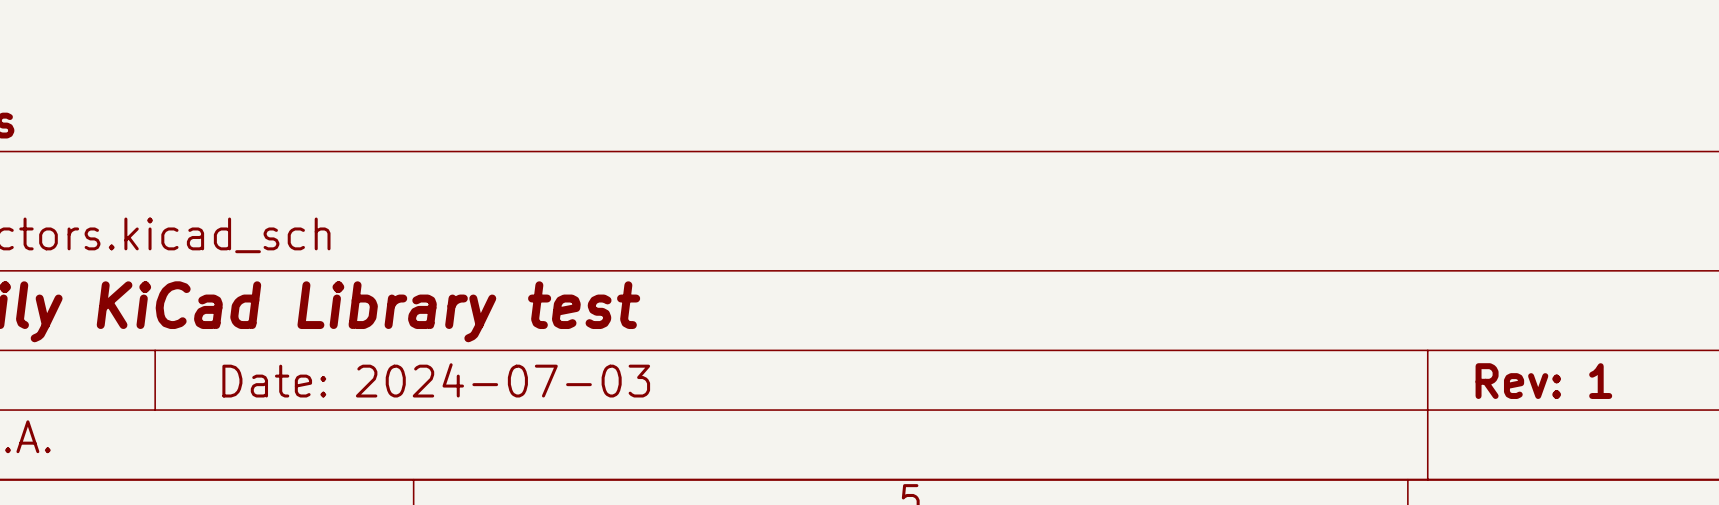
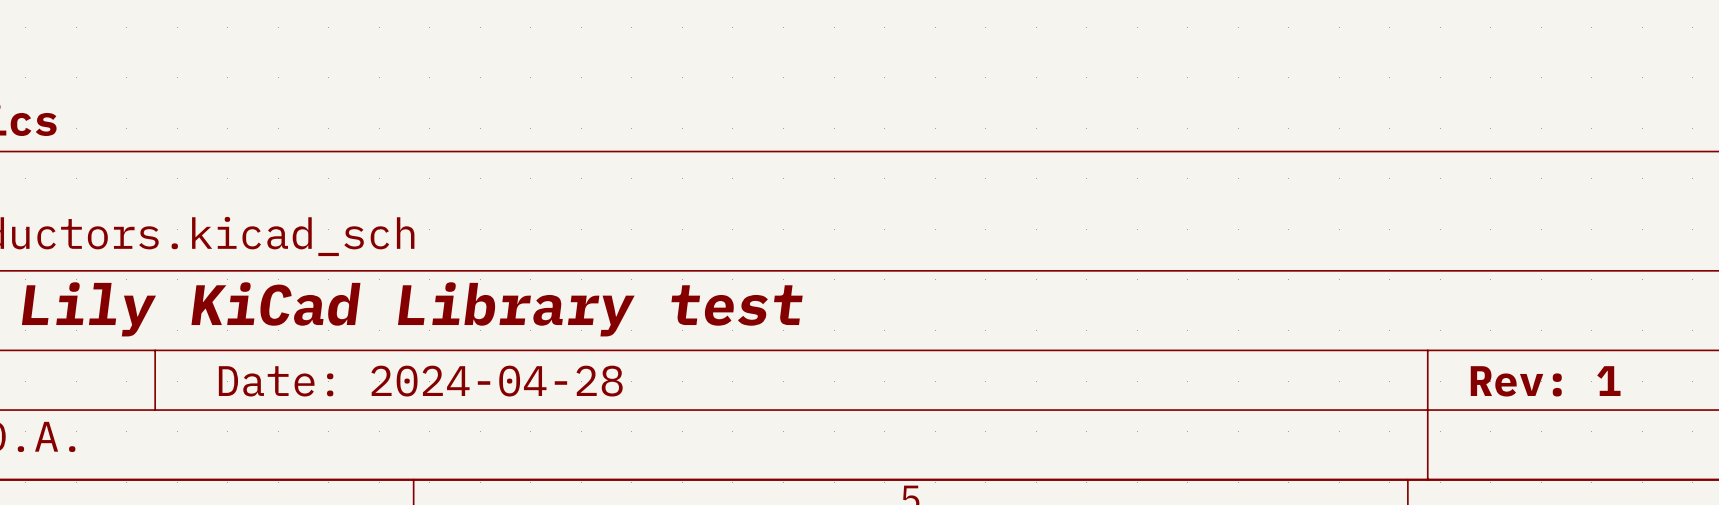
title block: Date: 2024-07-03 (436, 380) -> Date: 2024-04-28 (420, 381)

